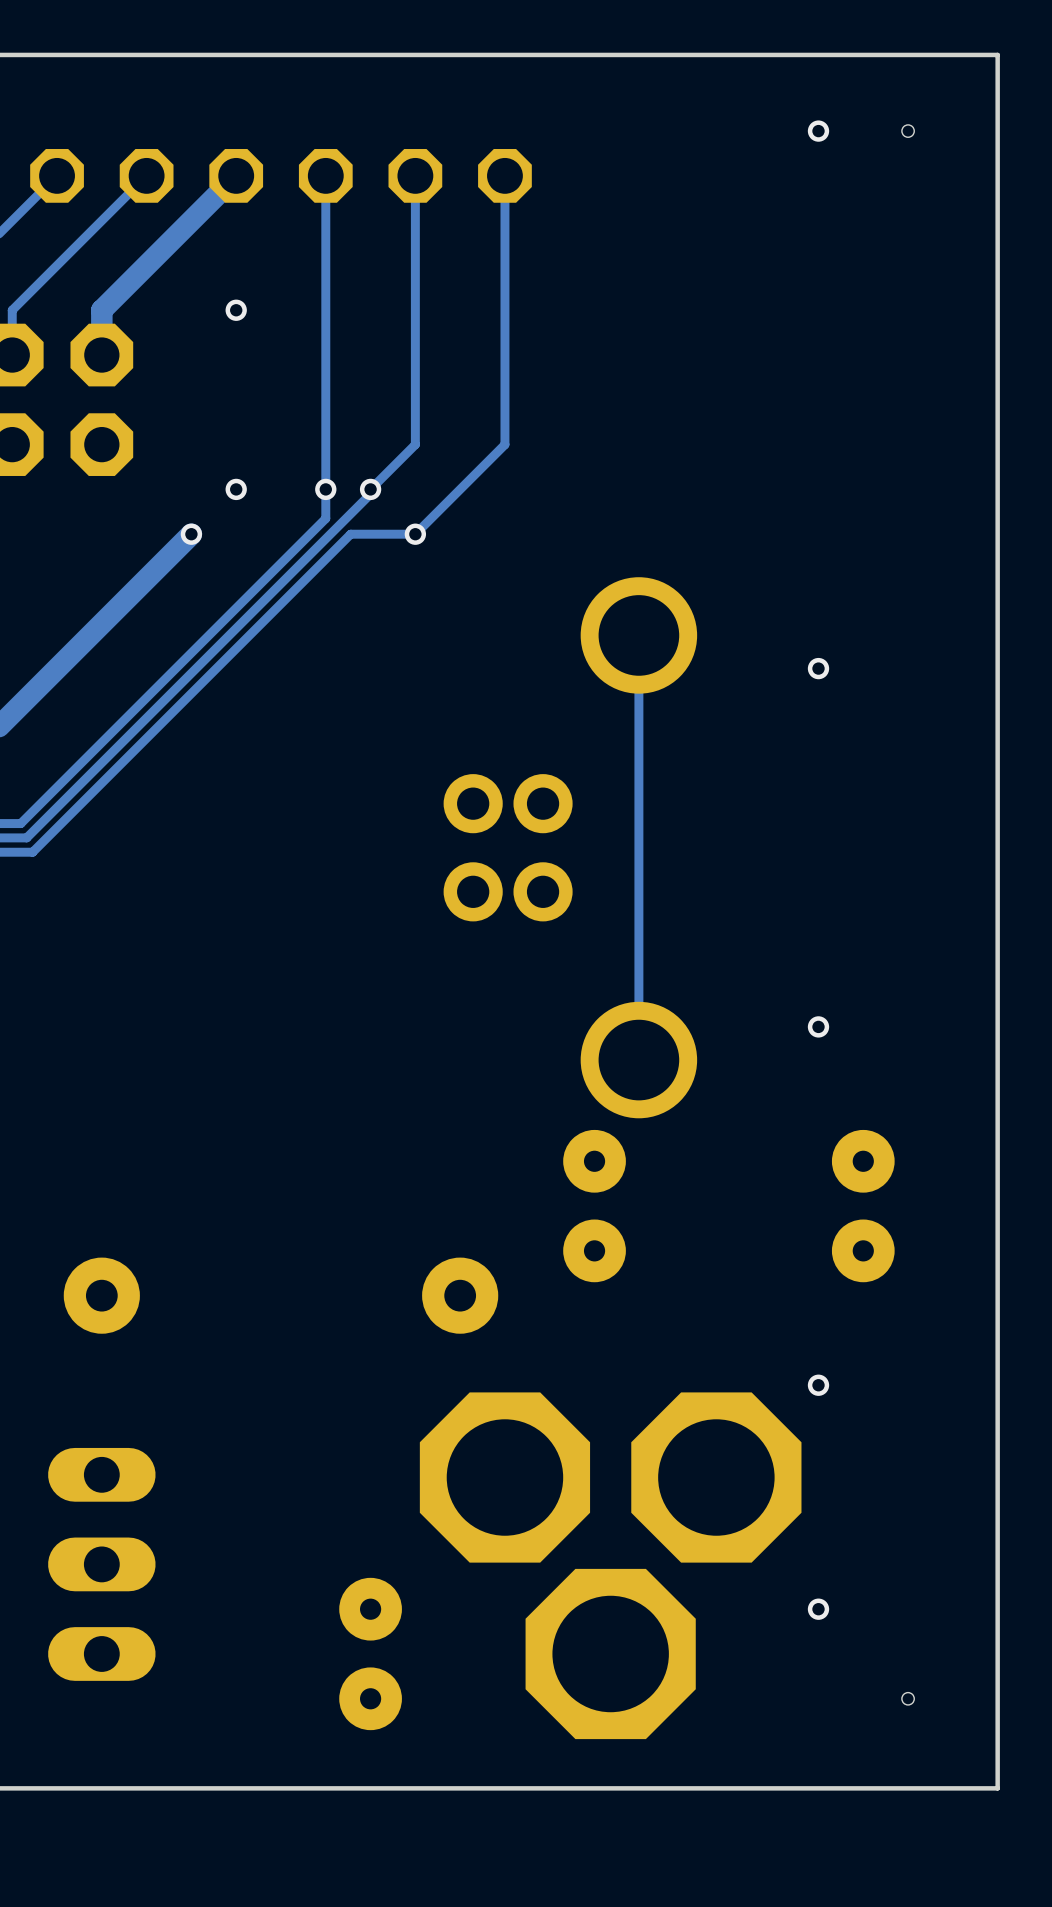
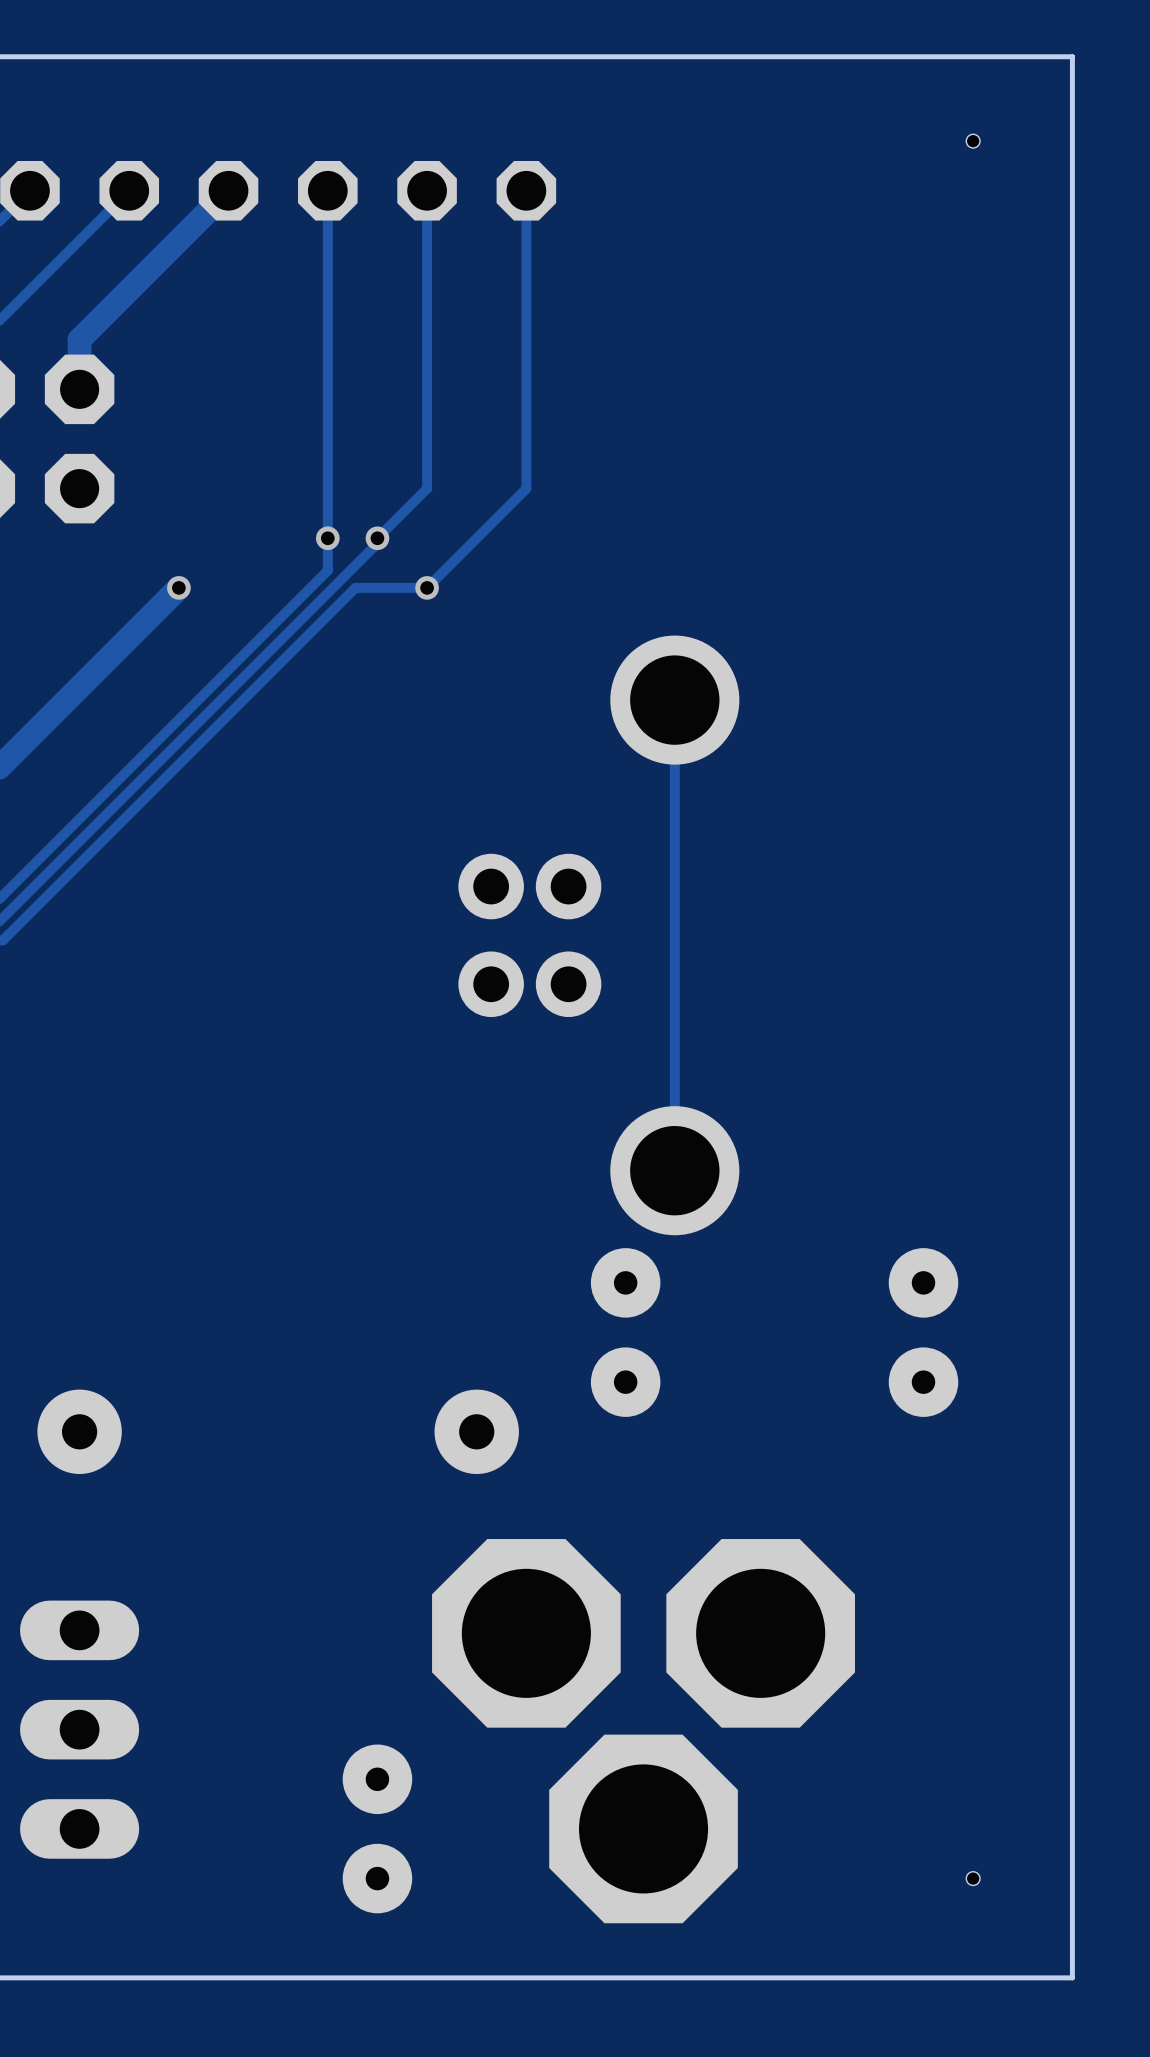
via: (818, 131) -> none
via: (236, 310) -> none
via: (236, 489) -> none
via: (818, 668) -> none
via: (818, 1026) -> none
via: (818, 1385) -> none
via: (818, 1609) -> none

